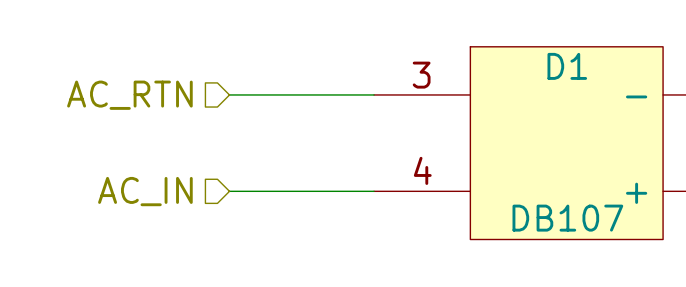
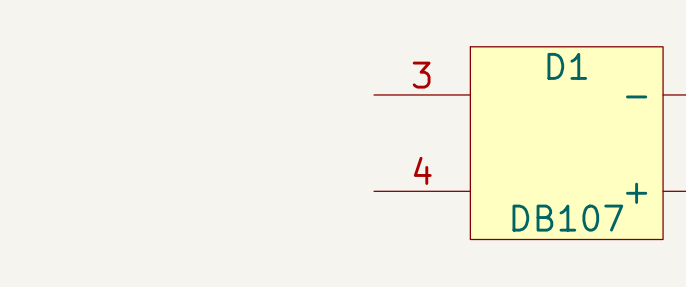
wire: (229, 94) (374, 94) -> none
hierarchical label: AC_RTN (129, 95) -> none
hierarchical label: AC_IN (145, 191) -> none
wire: (229, 191) (374, 191) -> none

